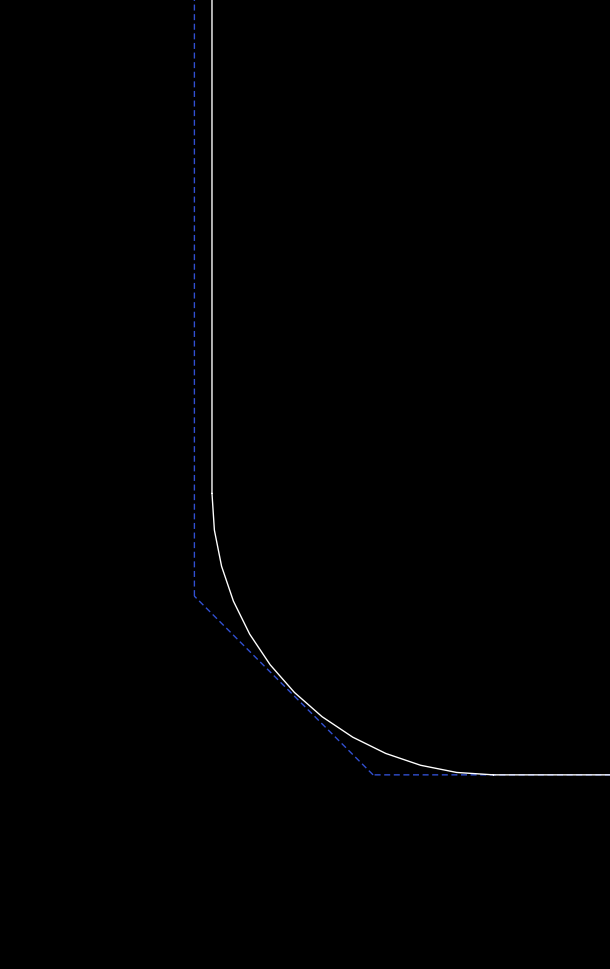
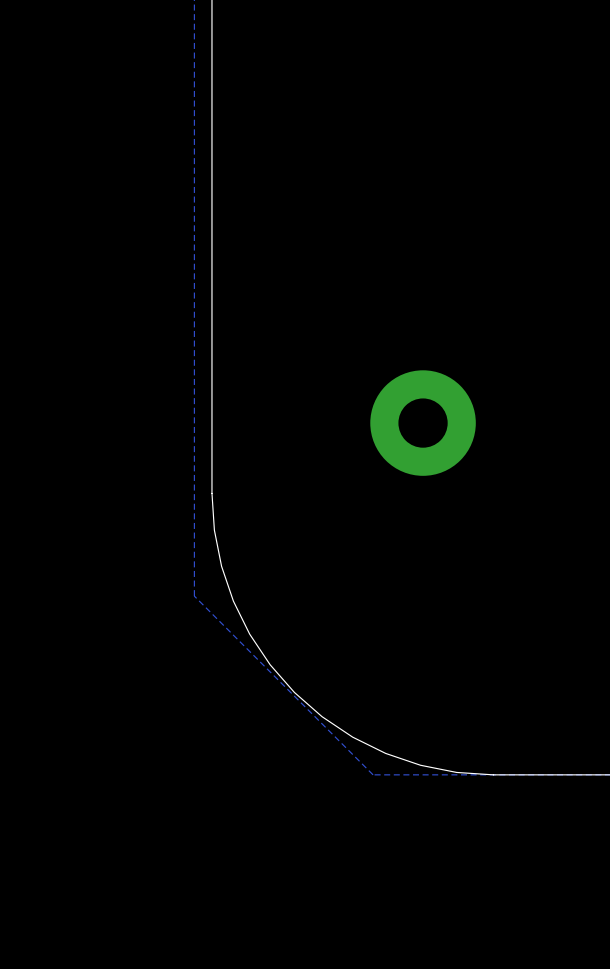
via: none -> (423, 423)

